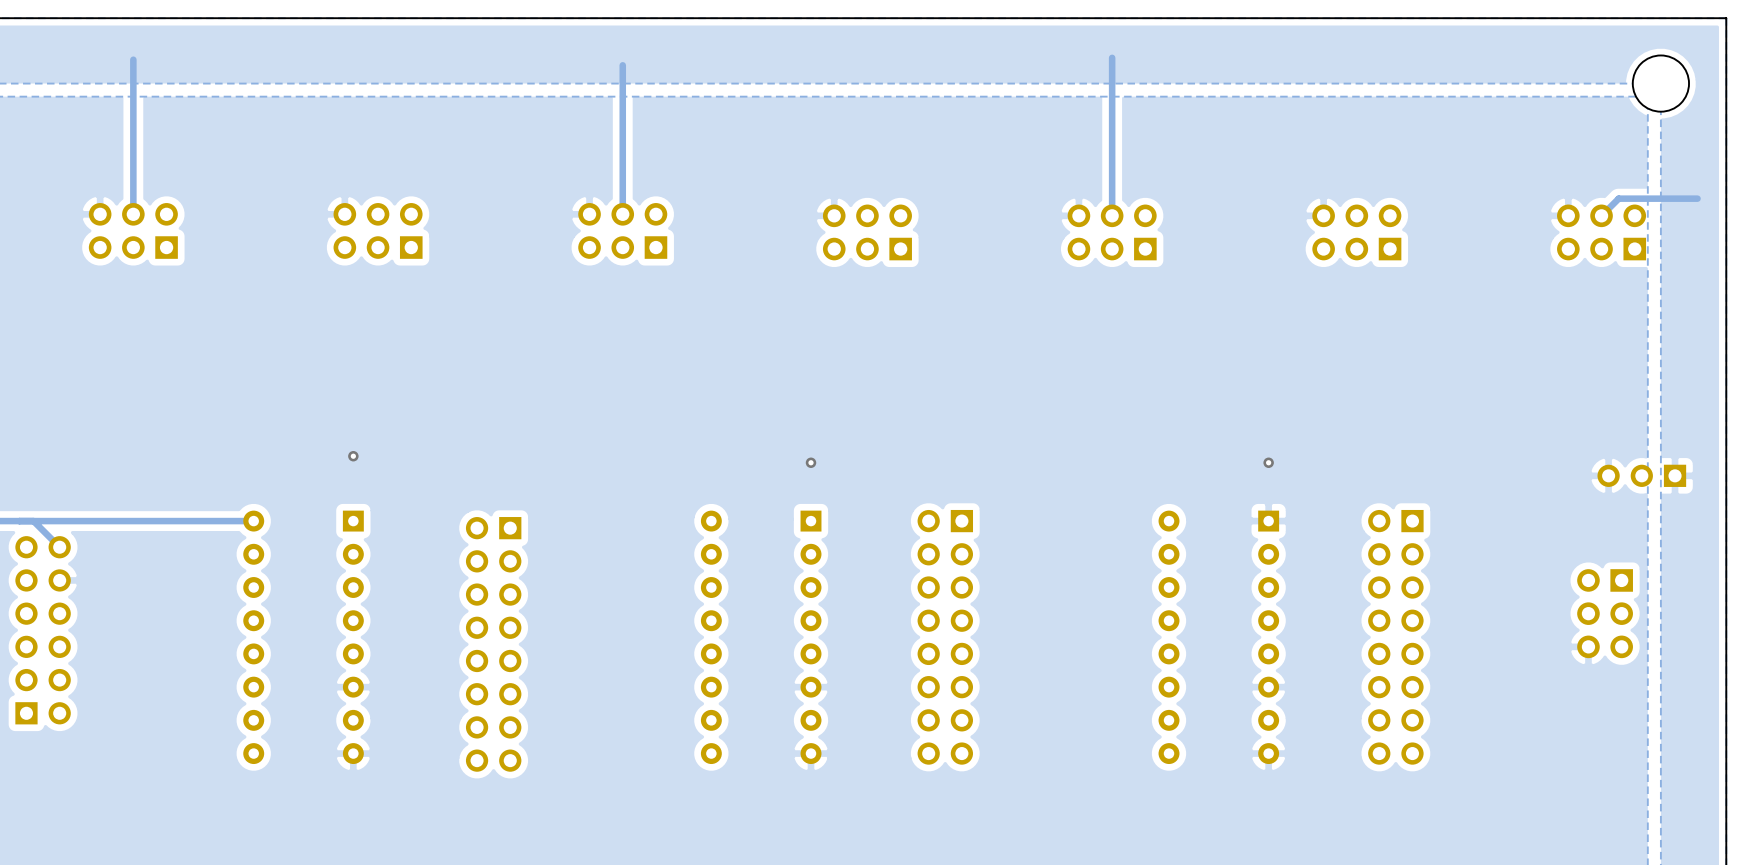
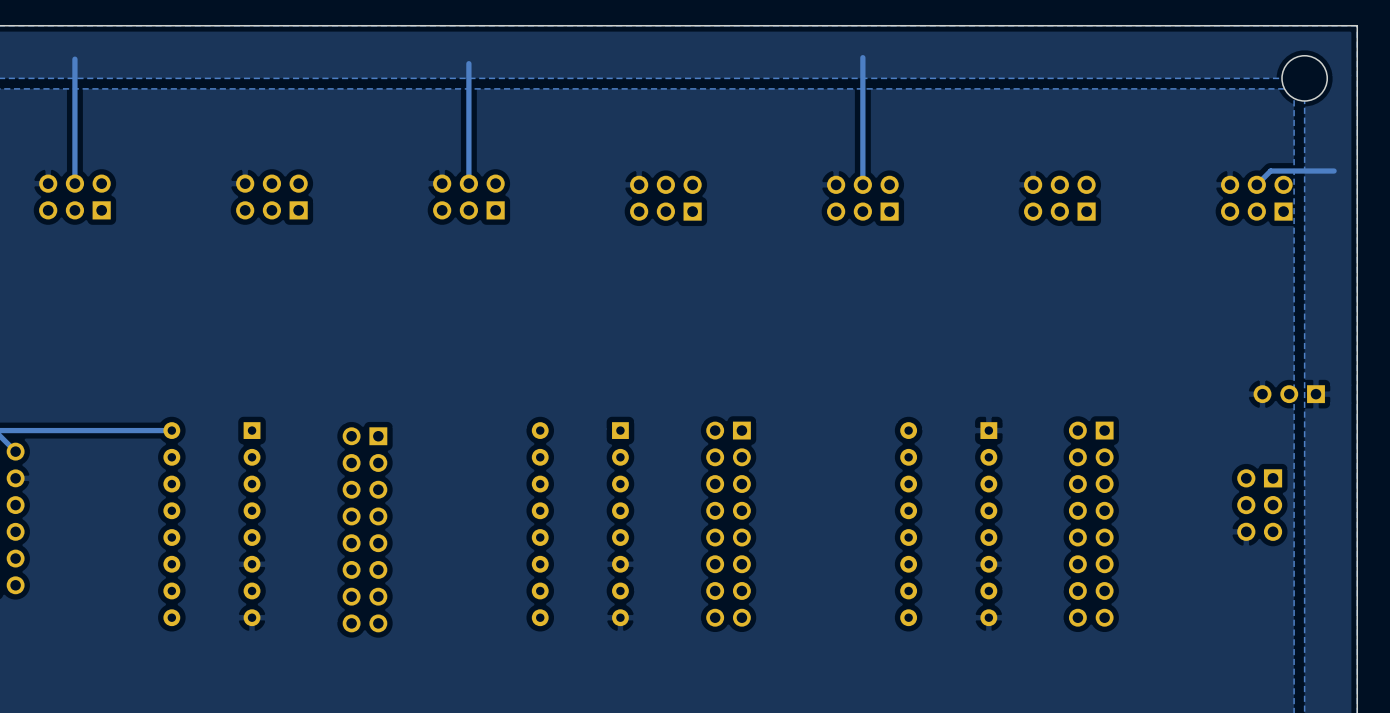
via: (353, 456) -> none
via: (811, 462) -> none
via: (1268, 462) -> none

